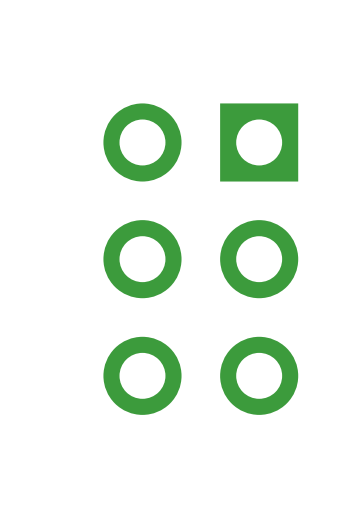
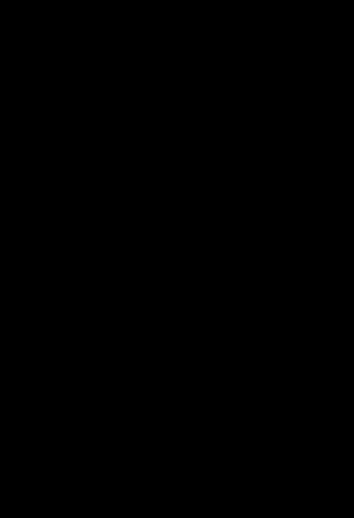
part: (200, 259) -> none

